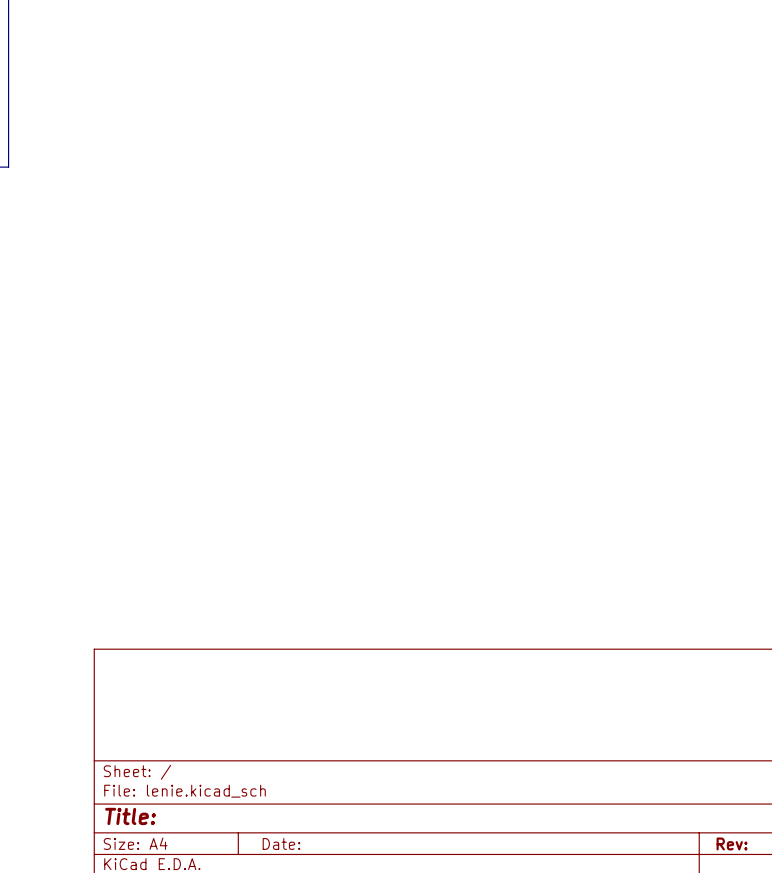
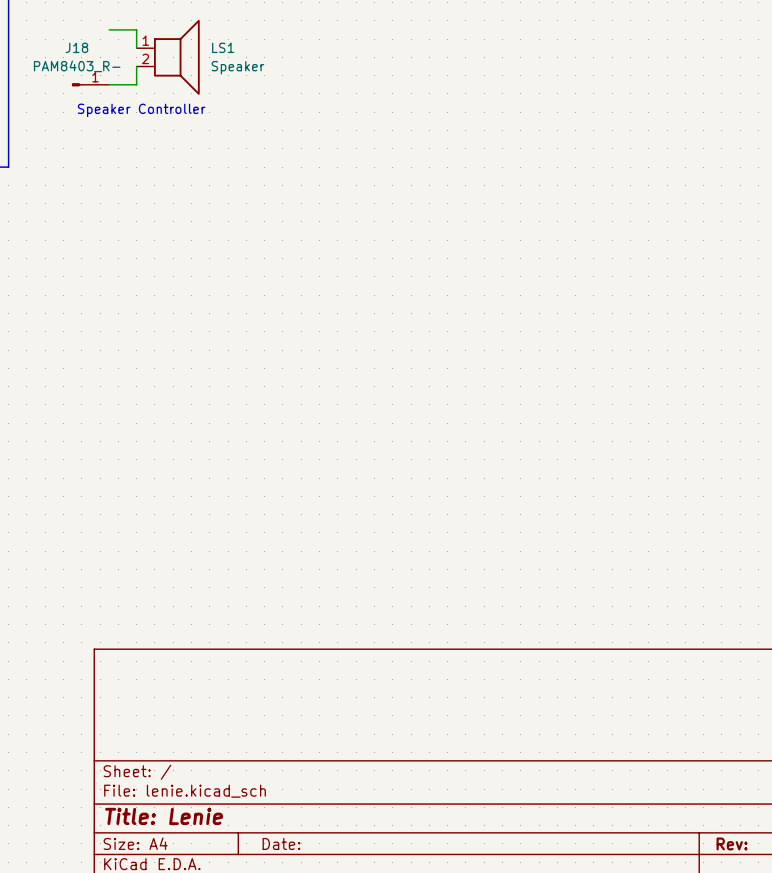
wire: none -> (109, 29) (136, 29) (136, 48)
LS1: none -> Speaker (168, 57)
wire: none -> (136, 66) (136, 84) (109, 84)
J18: none -> PAM8403_R- (90, 84)
text: none -> Speaker Controller (141, 110)
title block: Title: (130, 816) -> Title: Lenie (164, 816)

